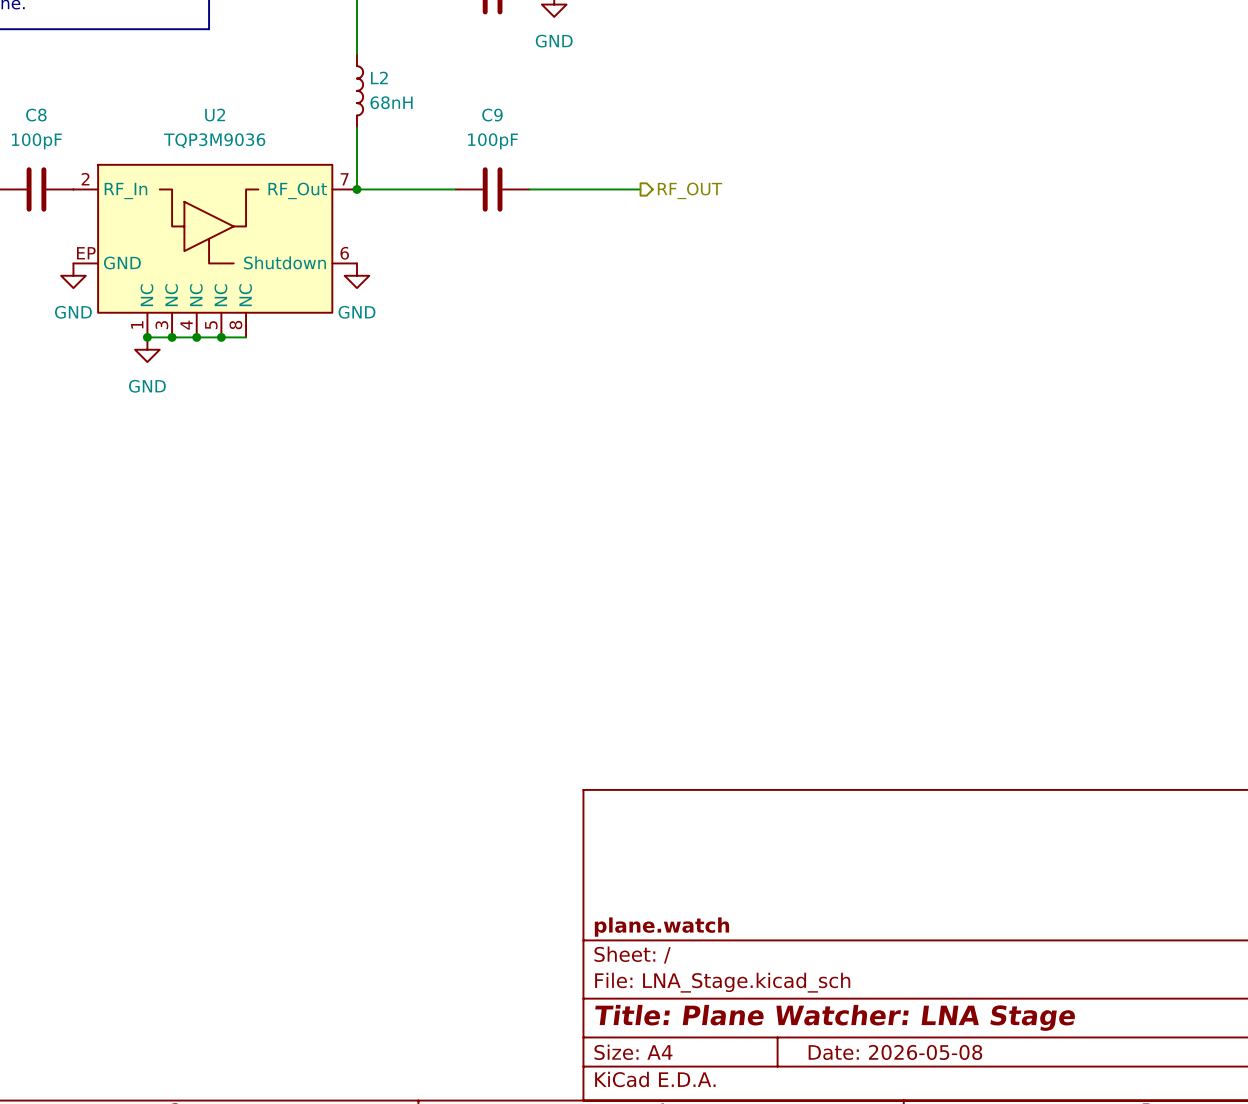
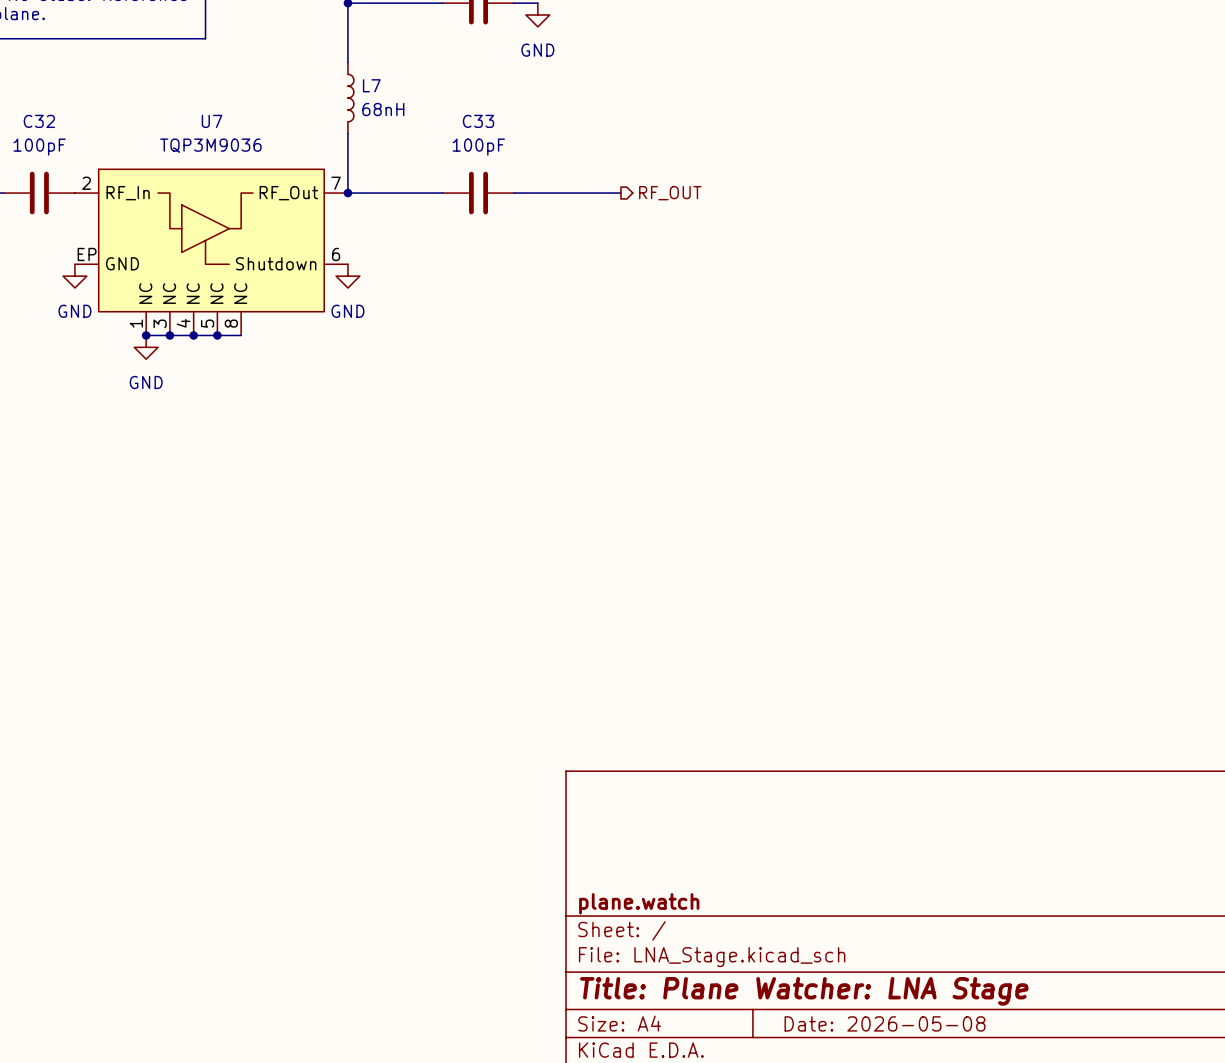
L2 name: L2 (379, 77) -> L7 (371, 85)
C8 name: C8 (36, 115) -> C32 (39, 121)
U2 name: U2 (215, 115) -> U7 (212, 121)
C9 name: C9 (492, 115) -> C33 (478, 121)

